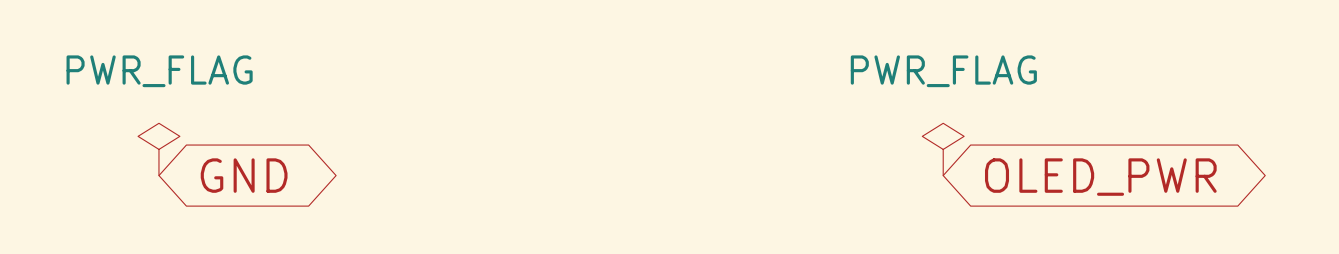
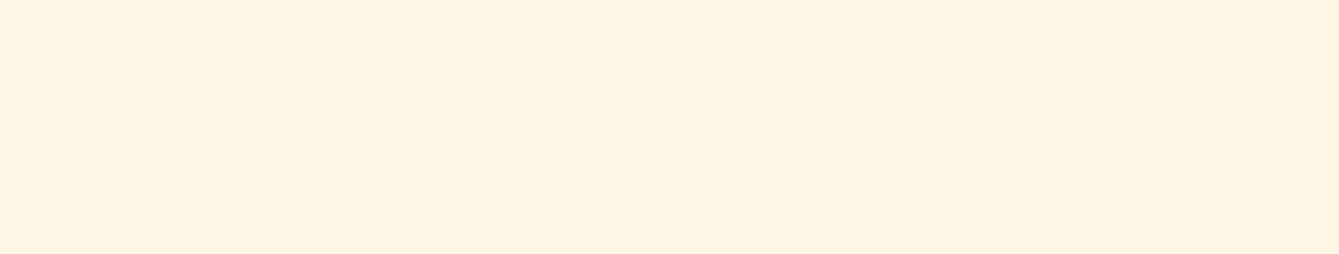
power symbol: PWR_FLAG (158, 149) -> none
power symbol: PWR_FLAG (943, 149) -> none
global label: GND (244, 175) -> none
global label: OLED_PWR (1100, 177) -> none

